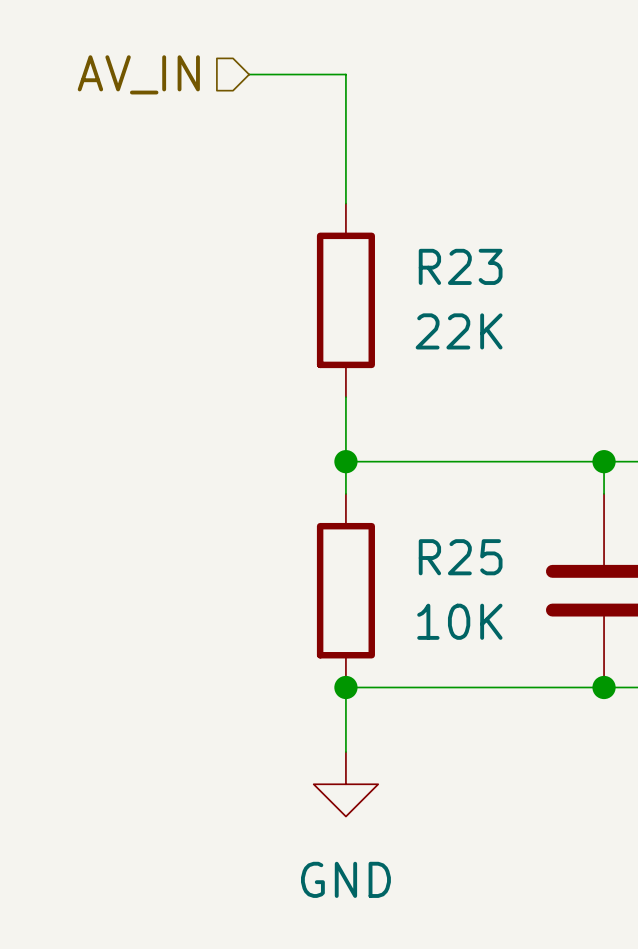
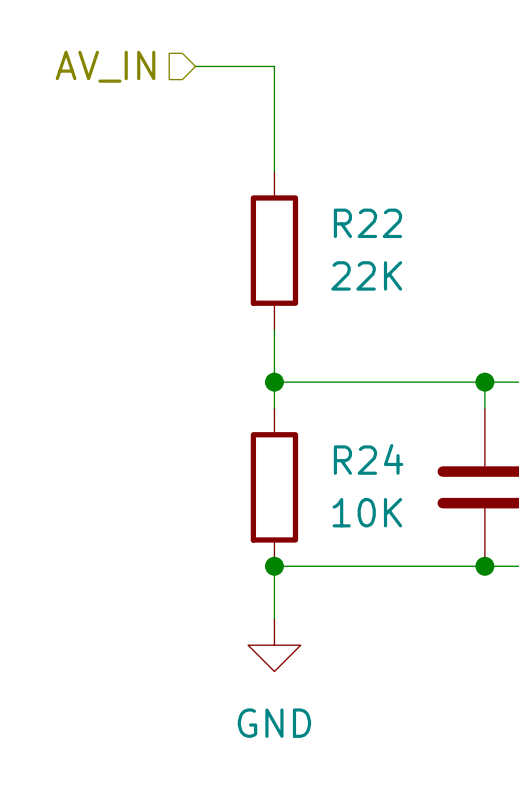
R23 name: R23 (460, 266) -> R22 (367, 223)
R25 name: R25 (460, 557) -> R24 (368, 459)

